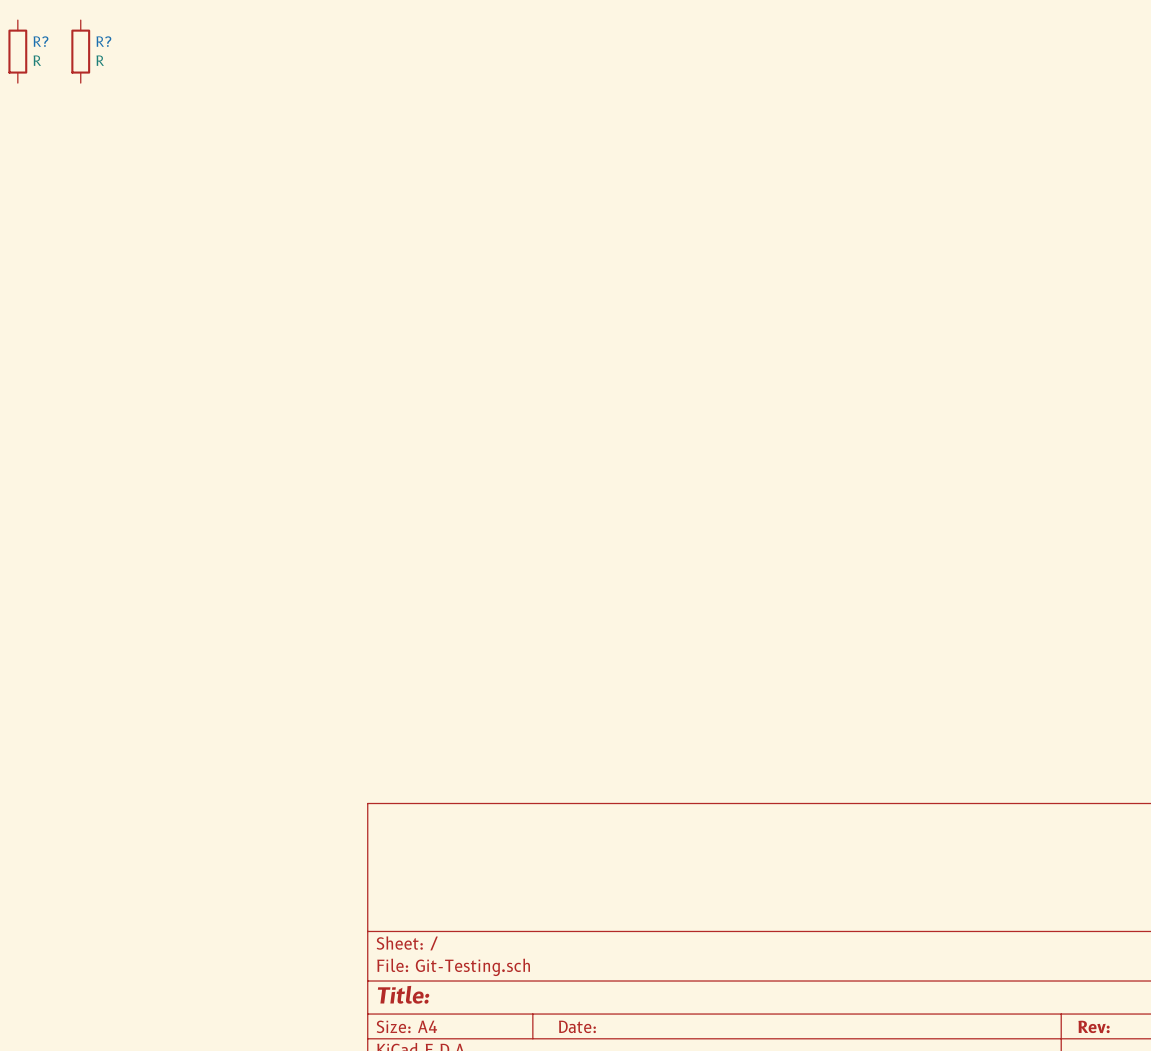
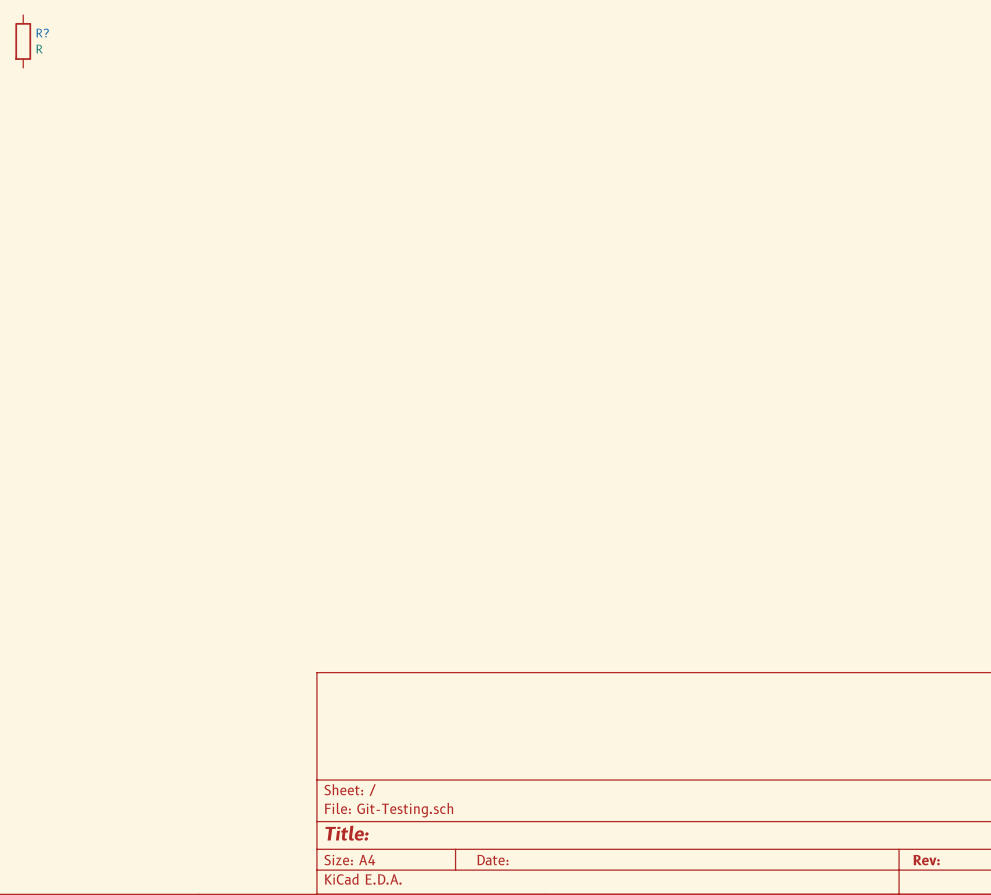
R?: R (80, 51) -> none

